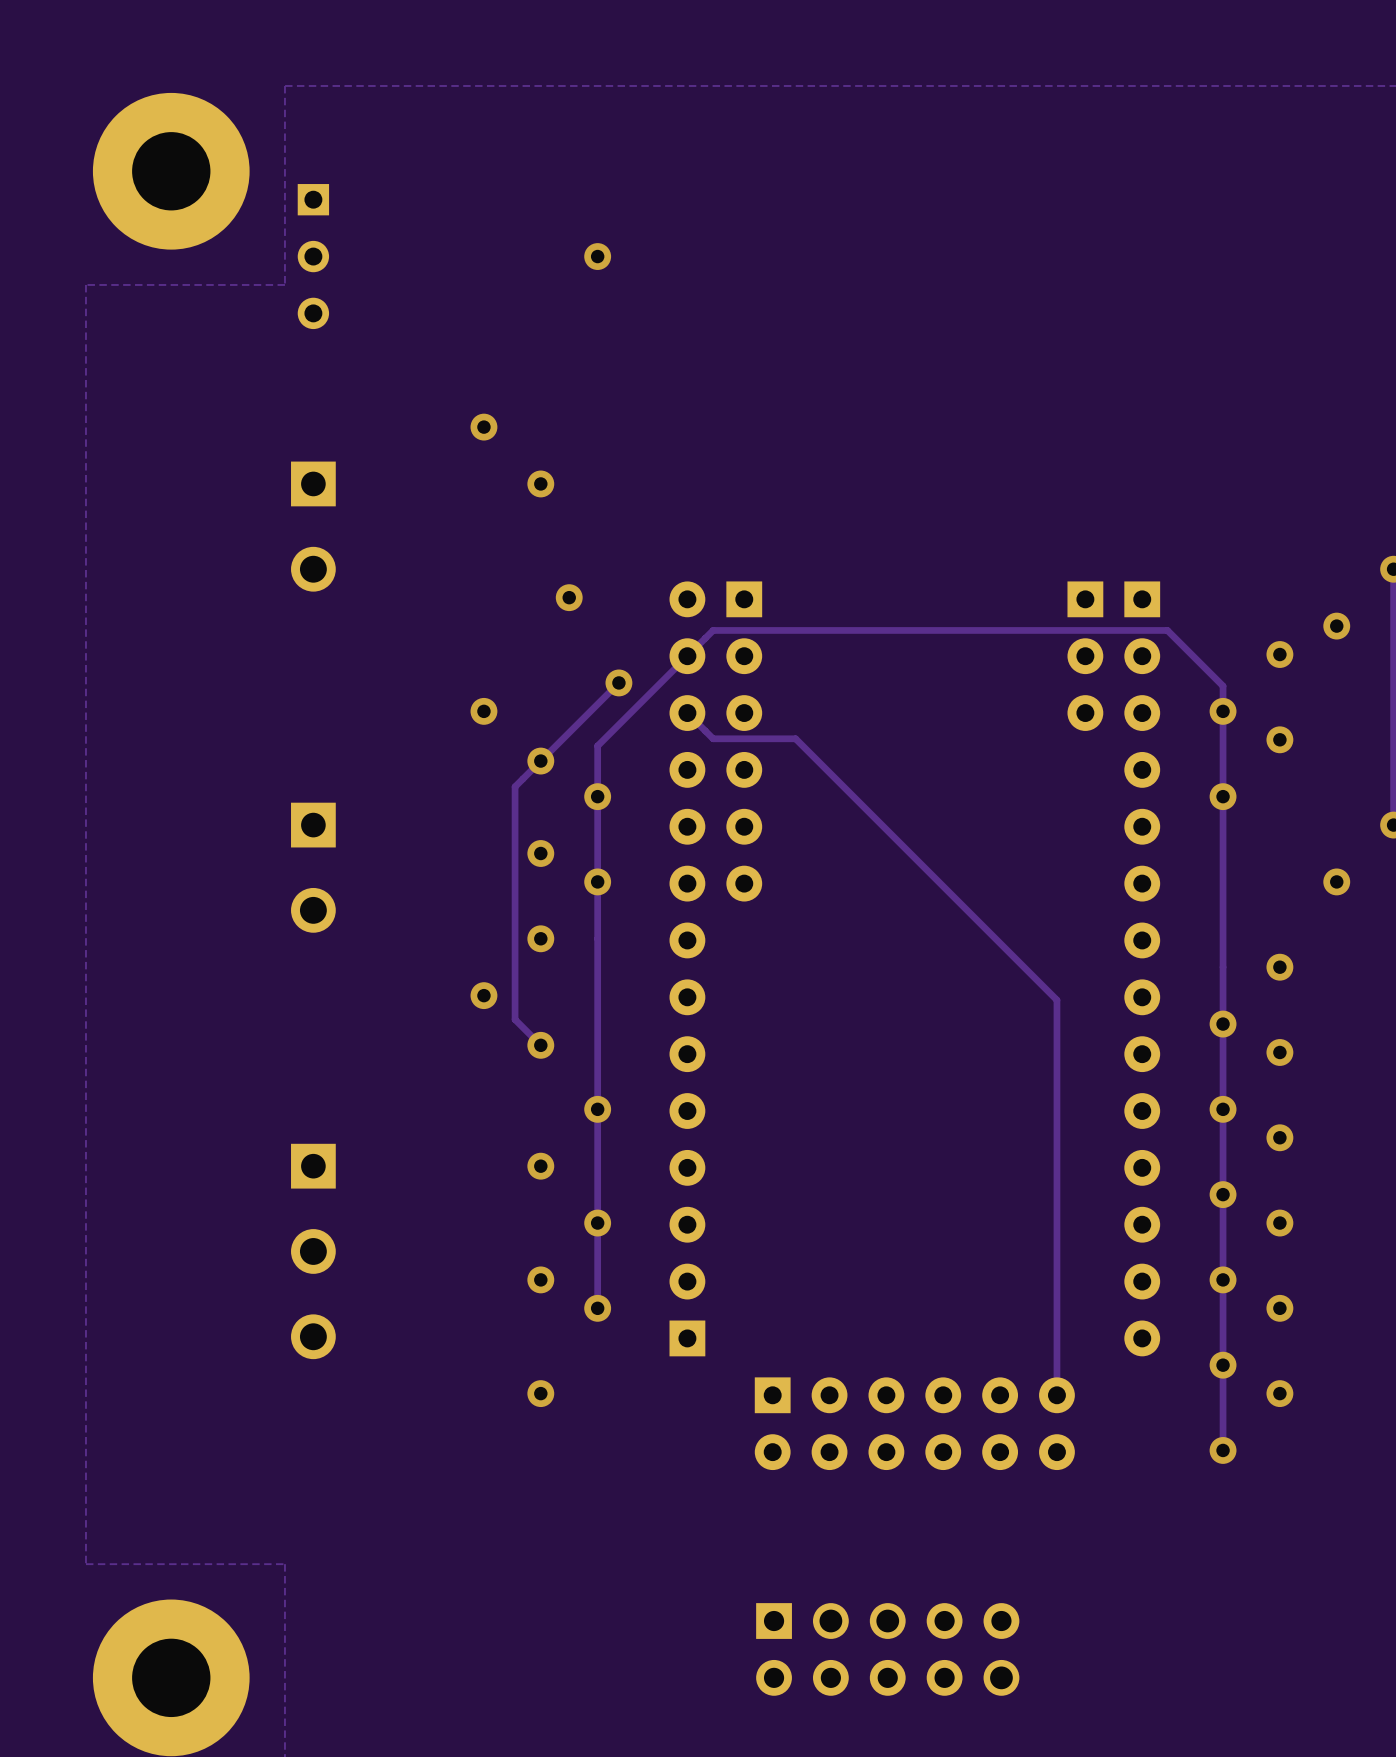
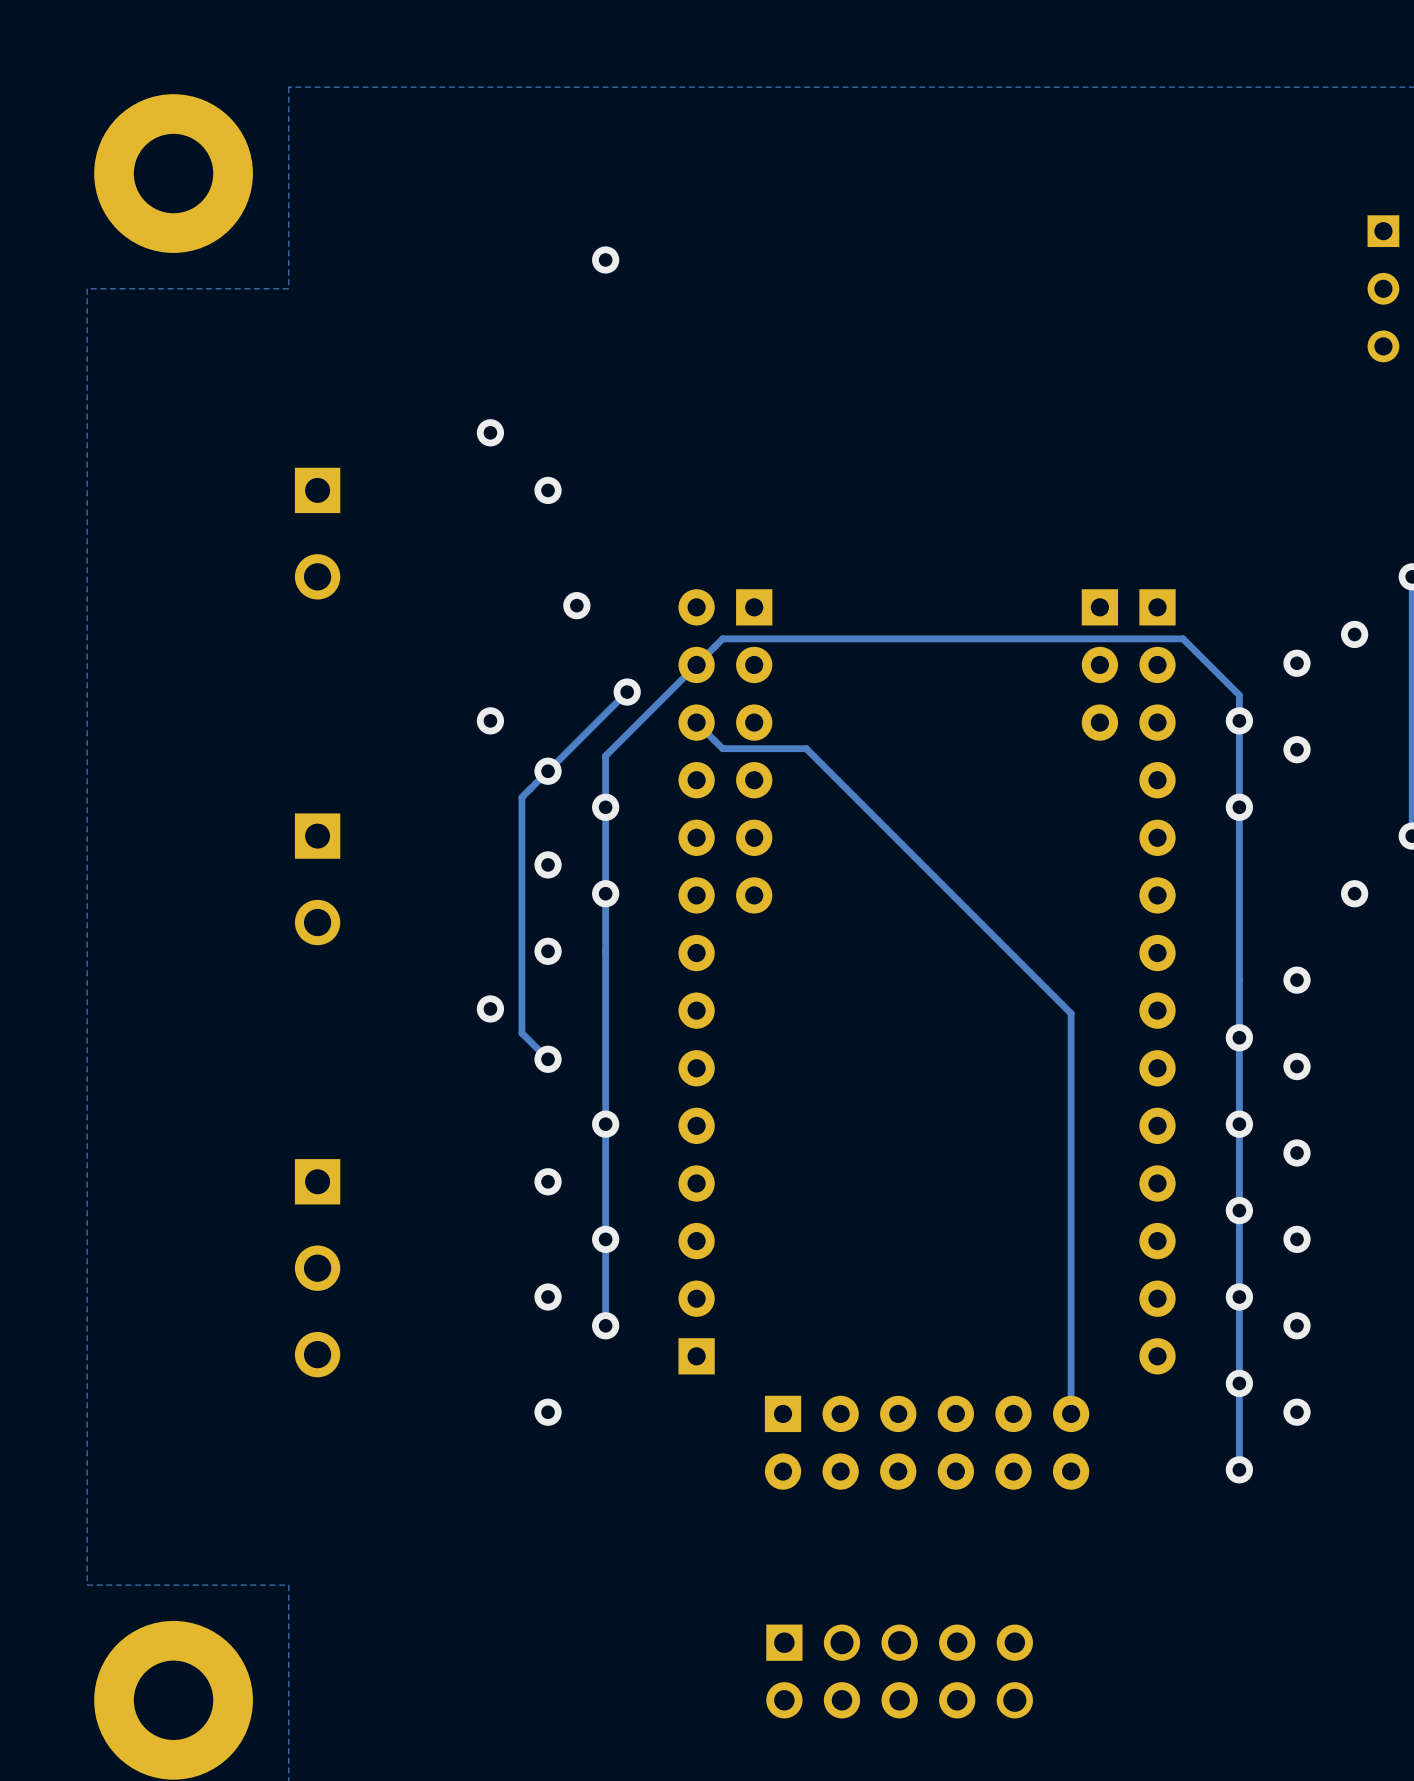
part: (313, 256) -> none
part: none -> (1383, 288)

